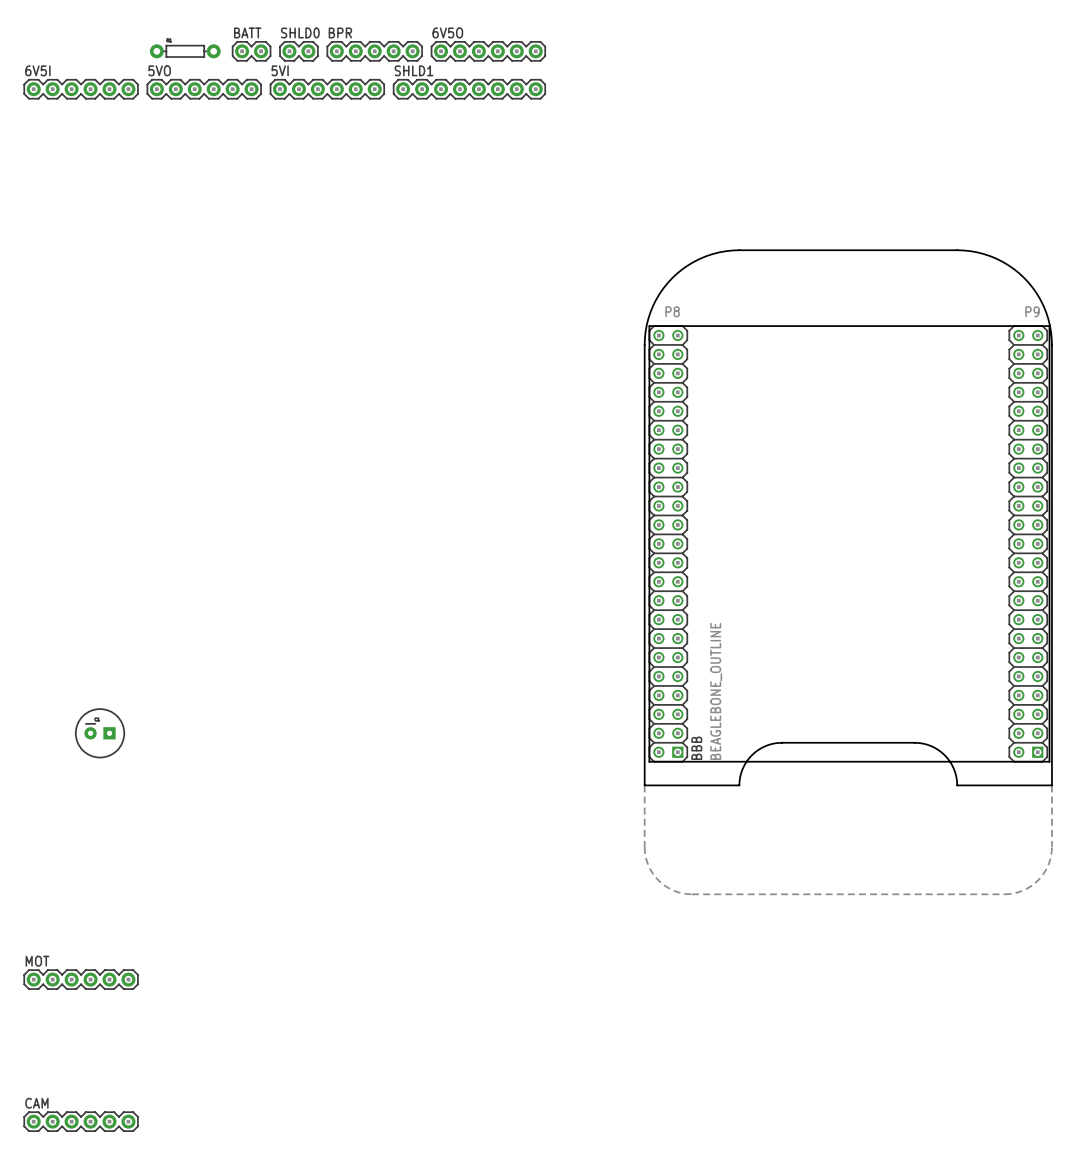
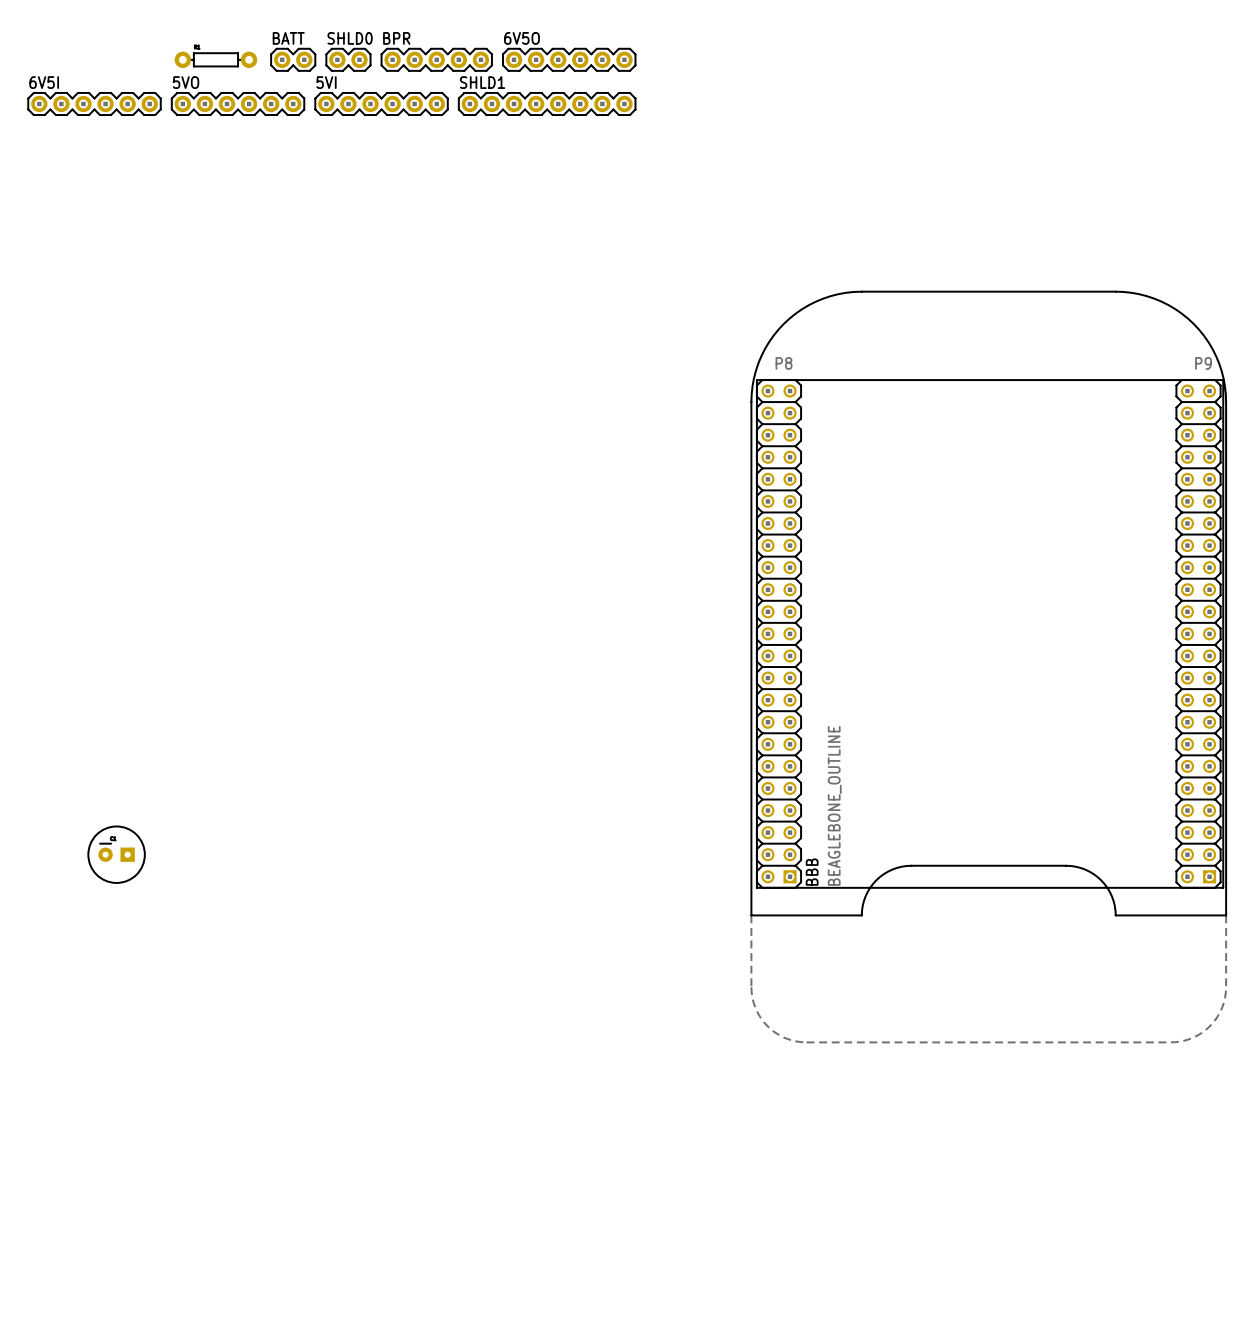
MOT: (81, 979) -> none
CAM: (81, 1121) -> none

